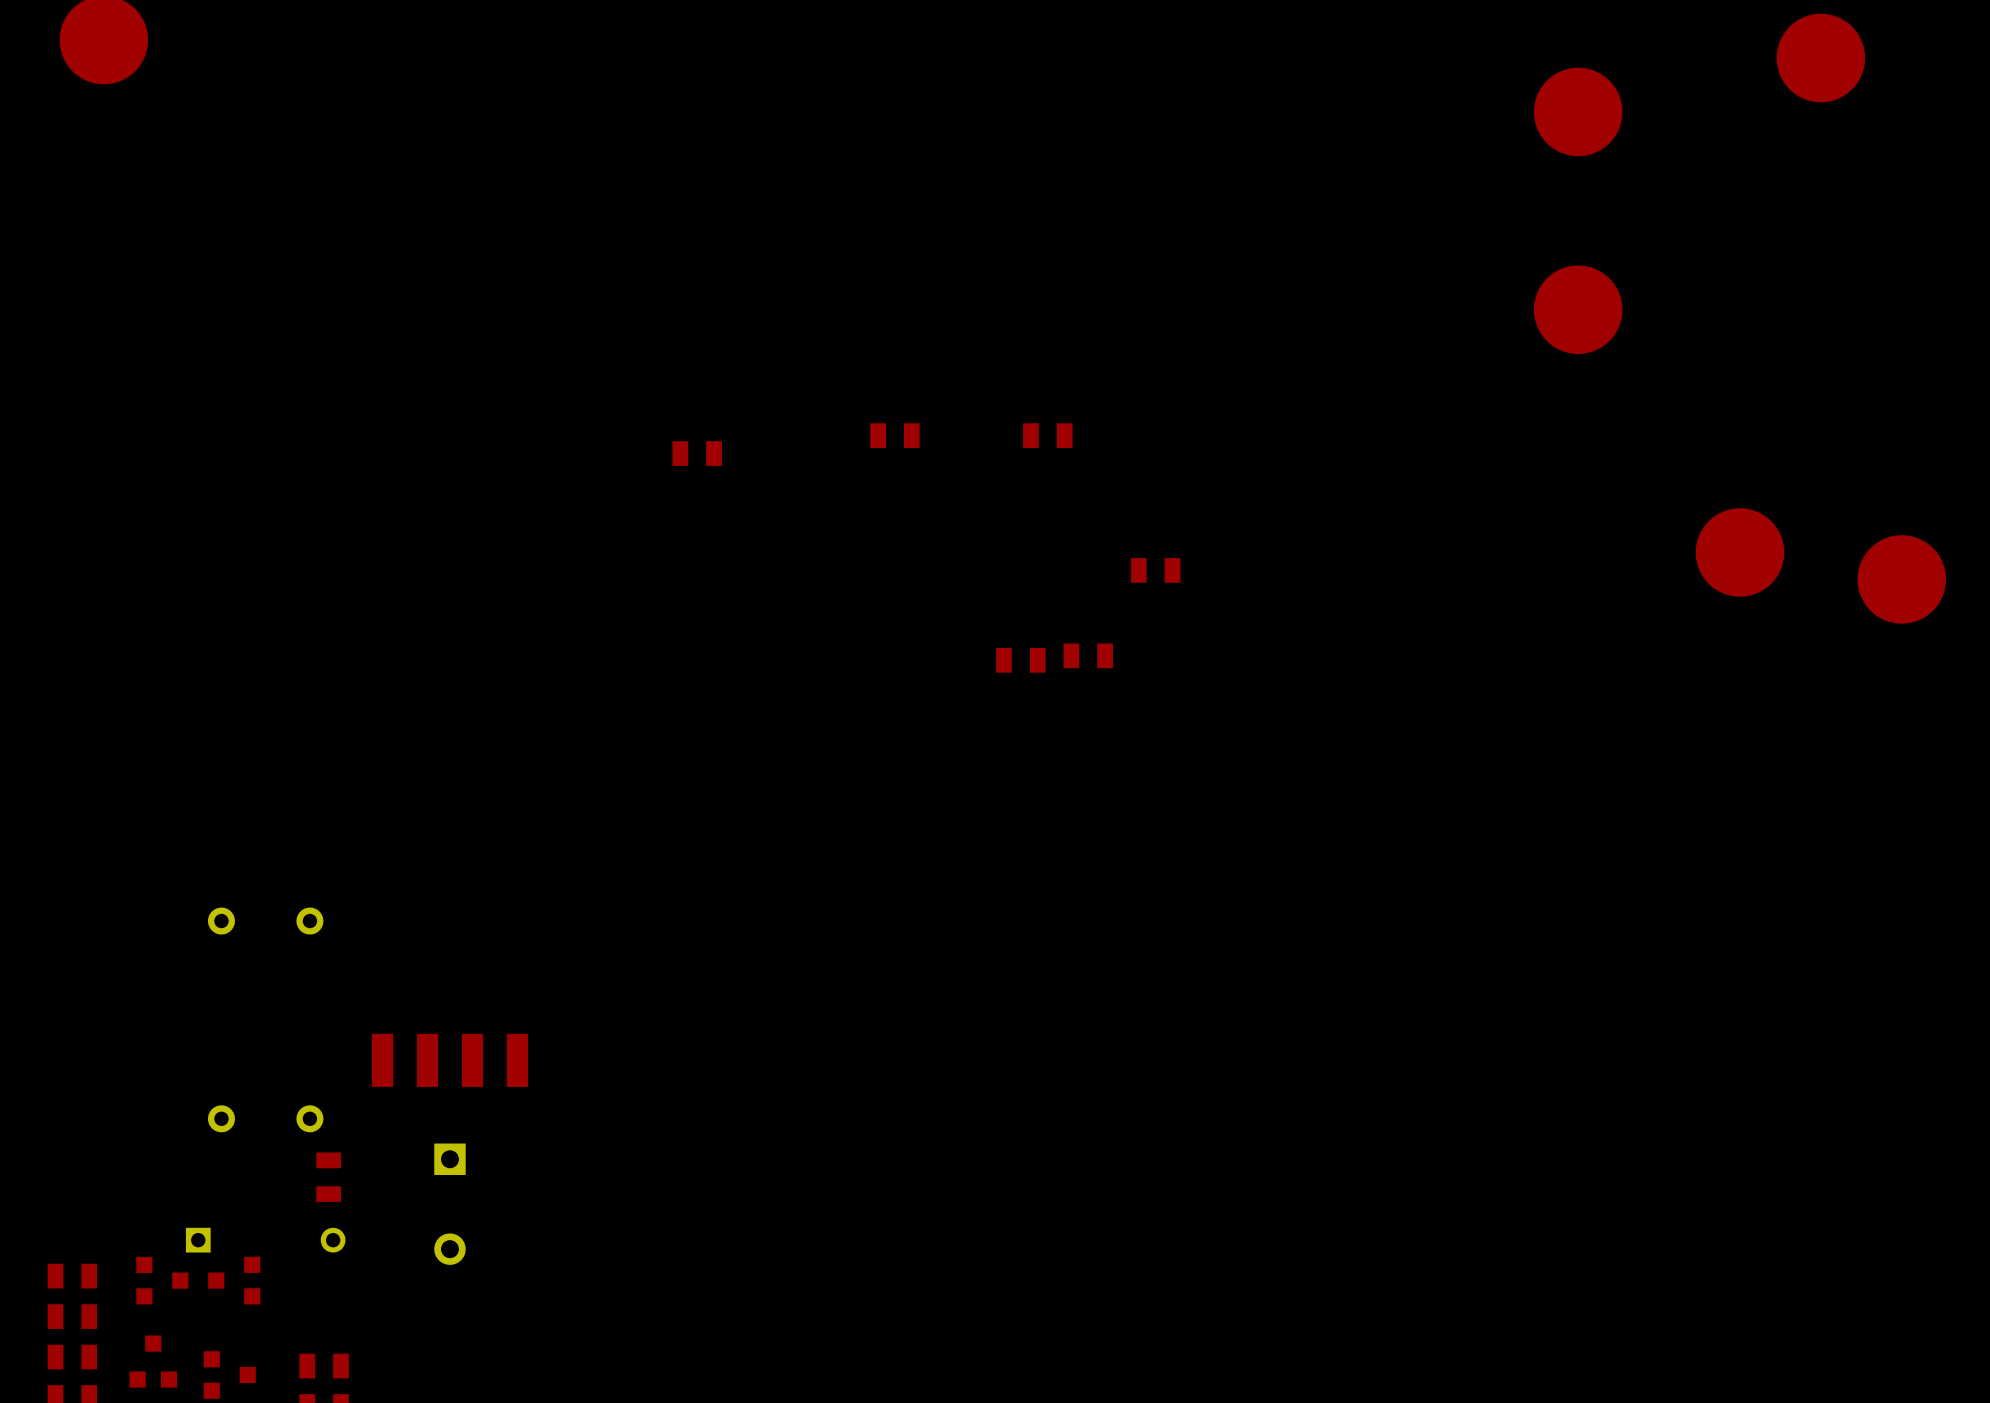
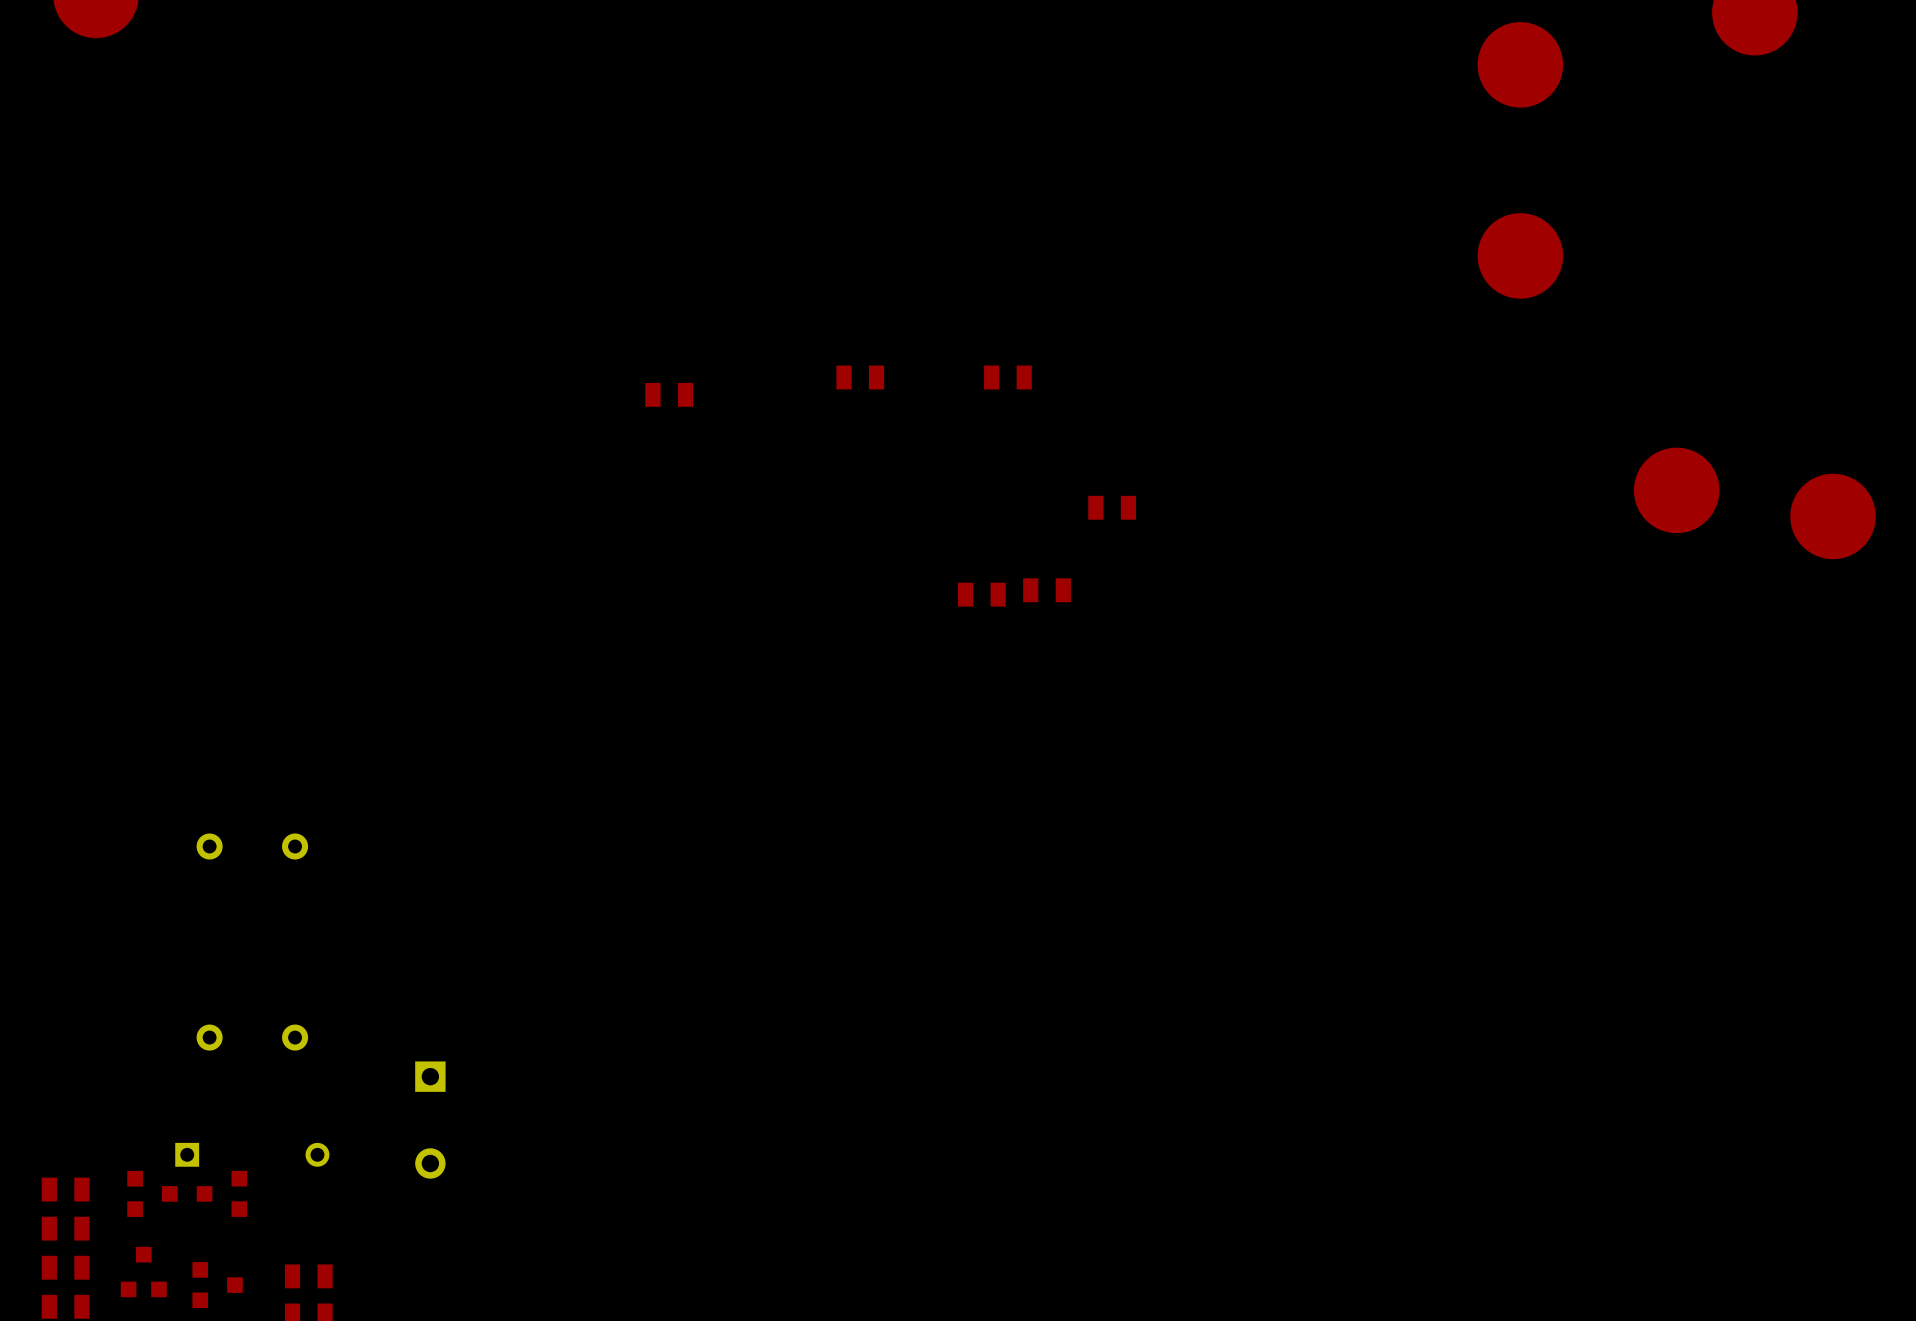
part: (449, 1060) -> none
part: (328, 1177) -> none

